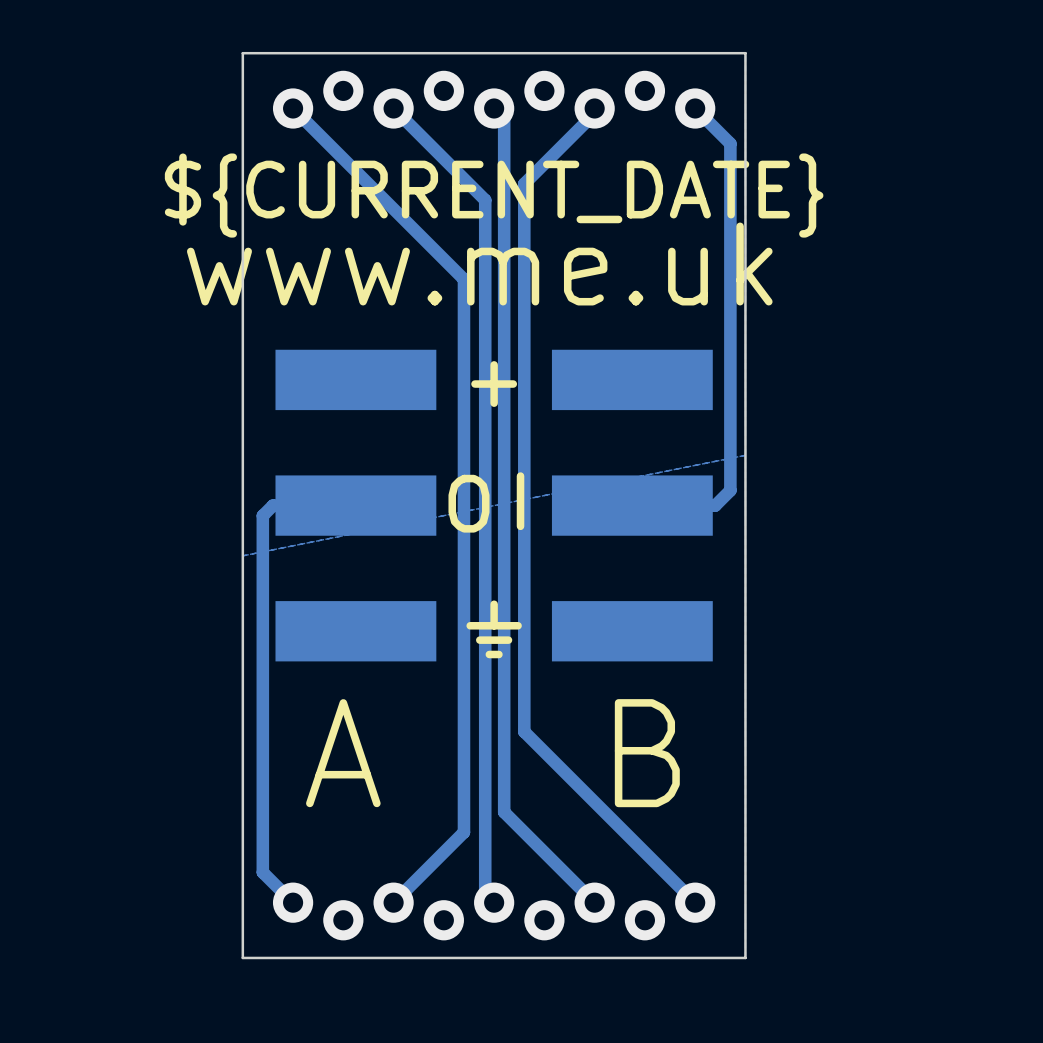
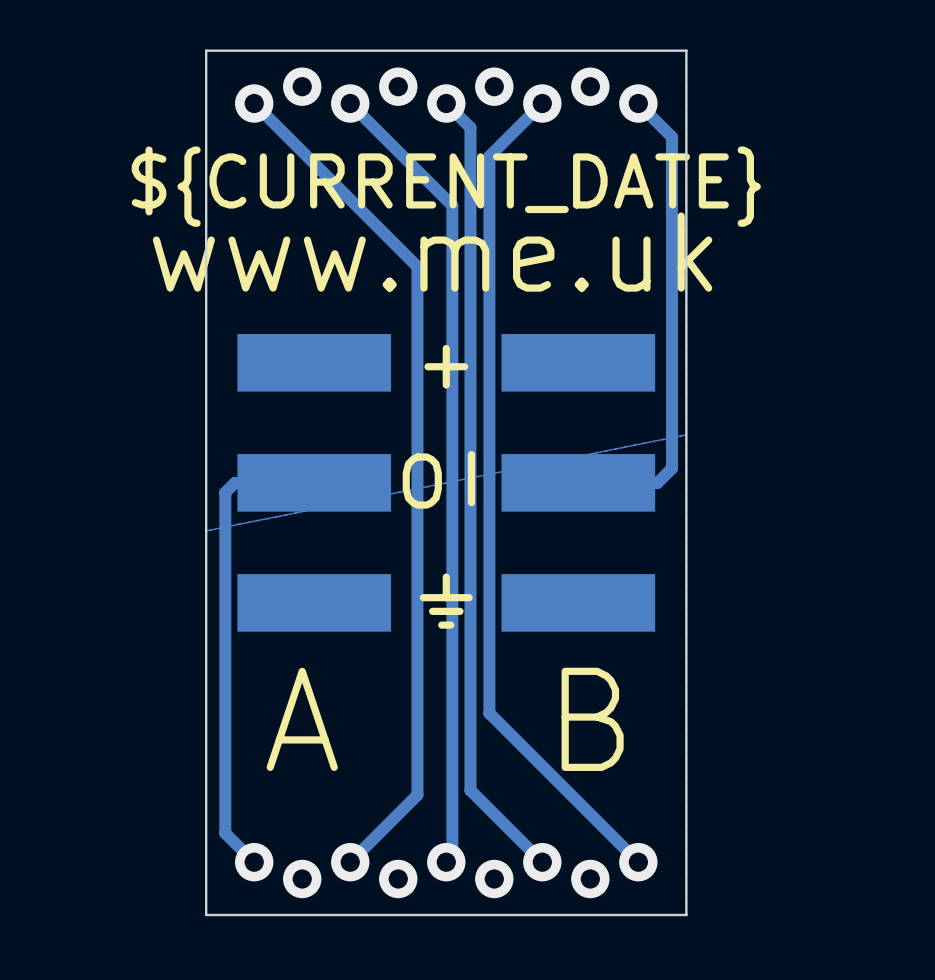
track: (594, 108) (594, 113) (524, 183) (524, 731) (539, 746) -> (542, 103) (489, 156) (489, 713)
track: (504, 118) (504, 812) (519, 827) -> (455, 113) (470, 127) (470, 790)
track: (485, 200) (485, 893) (494, 902) -> (437, 191) (452, 205) (452, 856) (446, 862)

